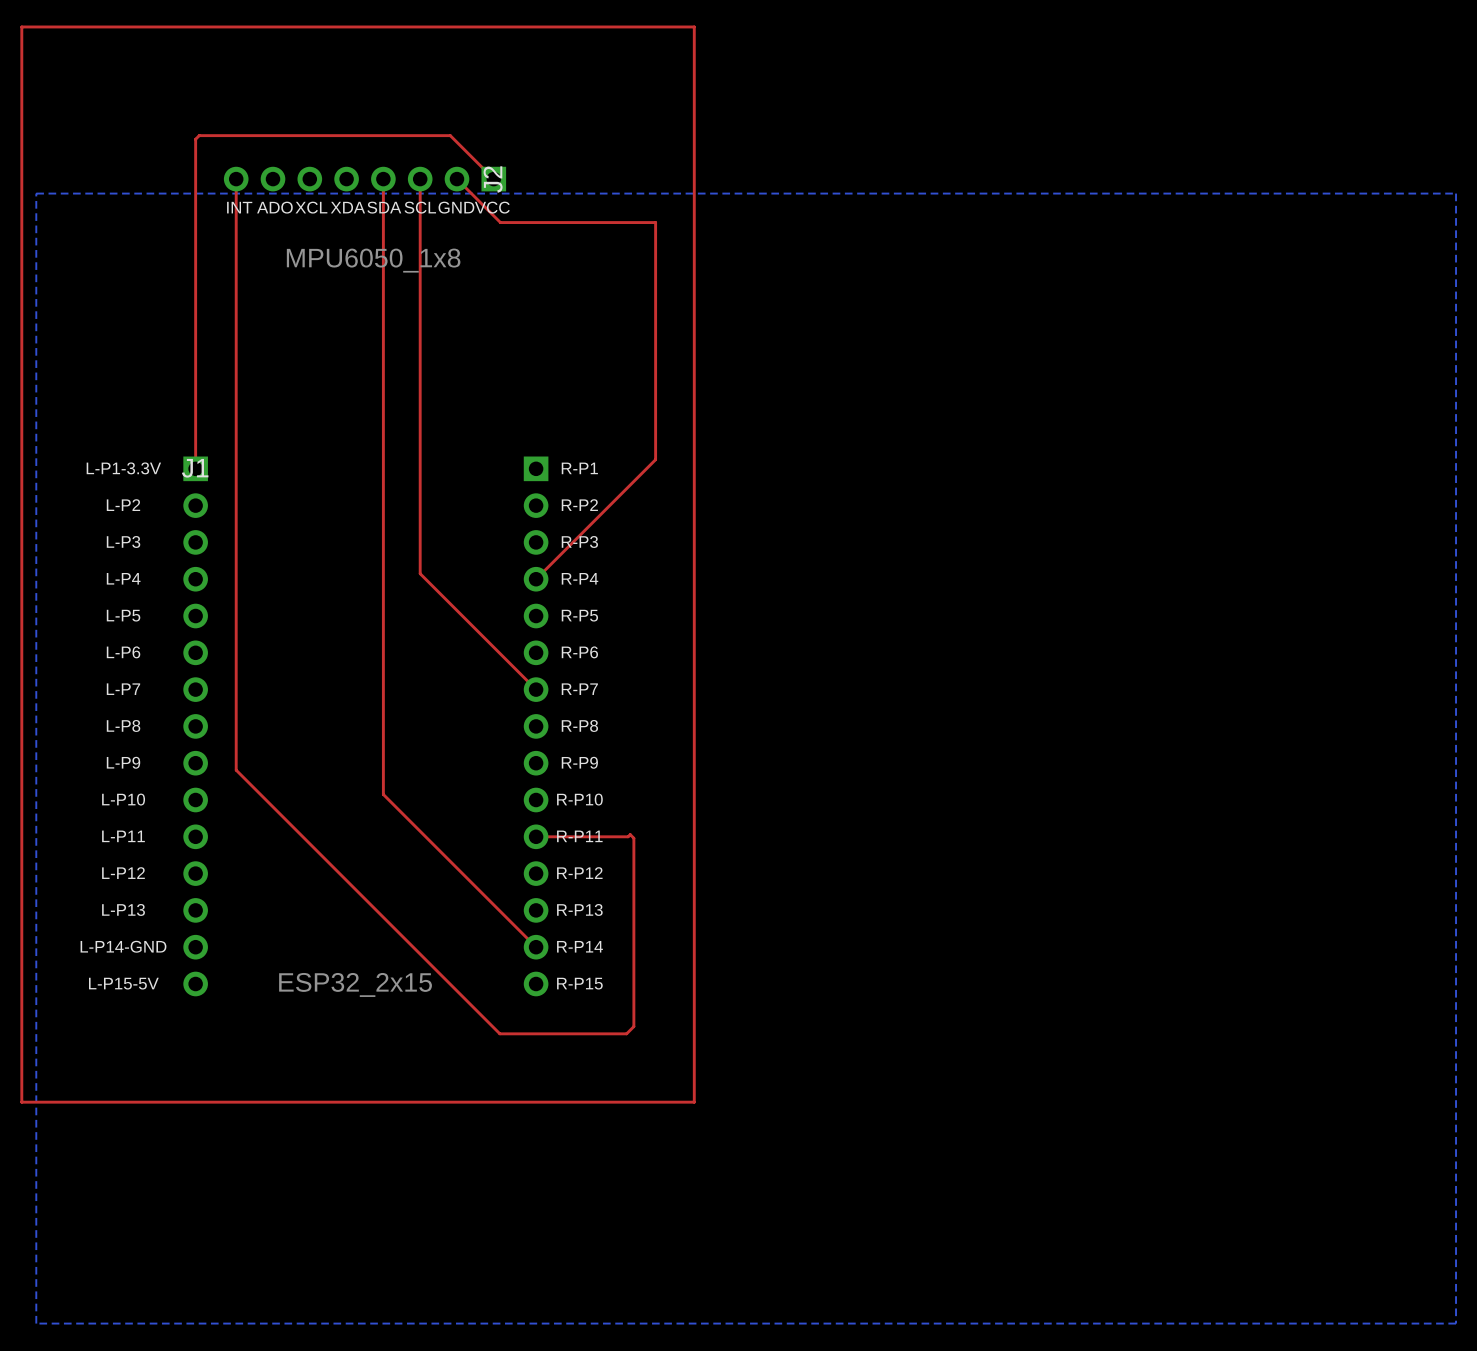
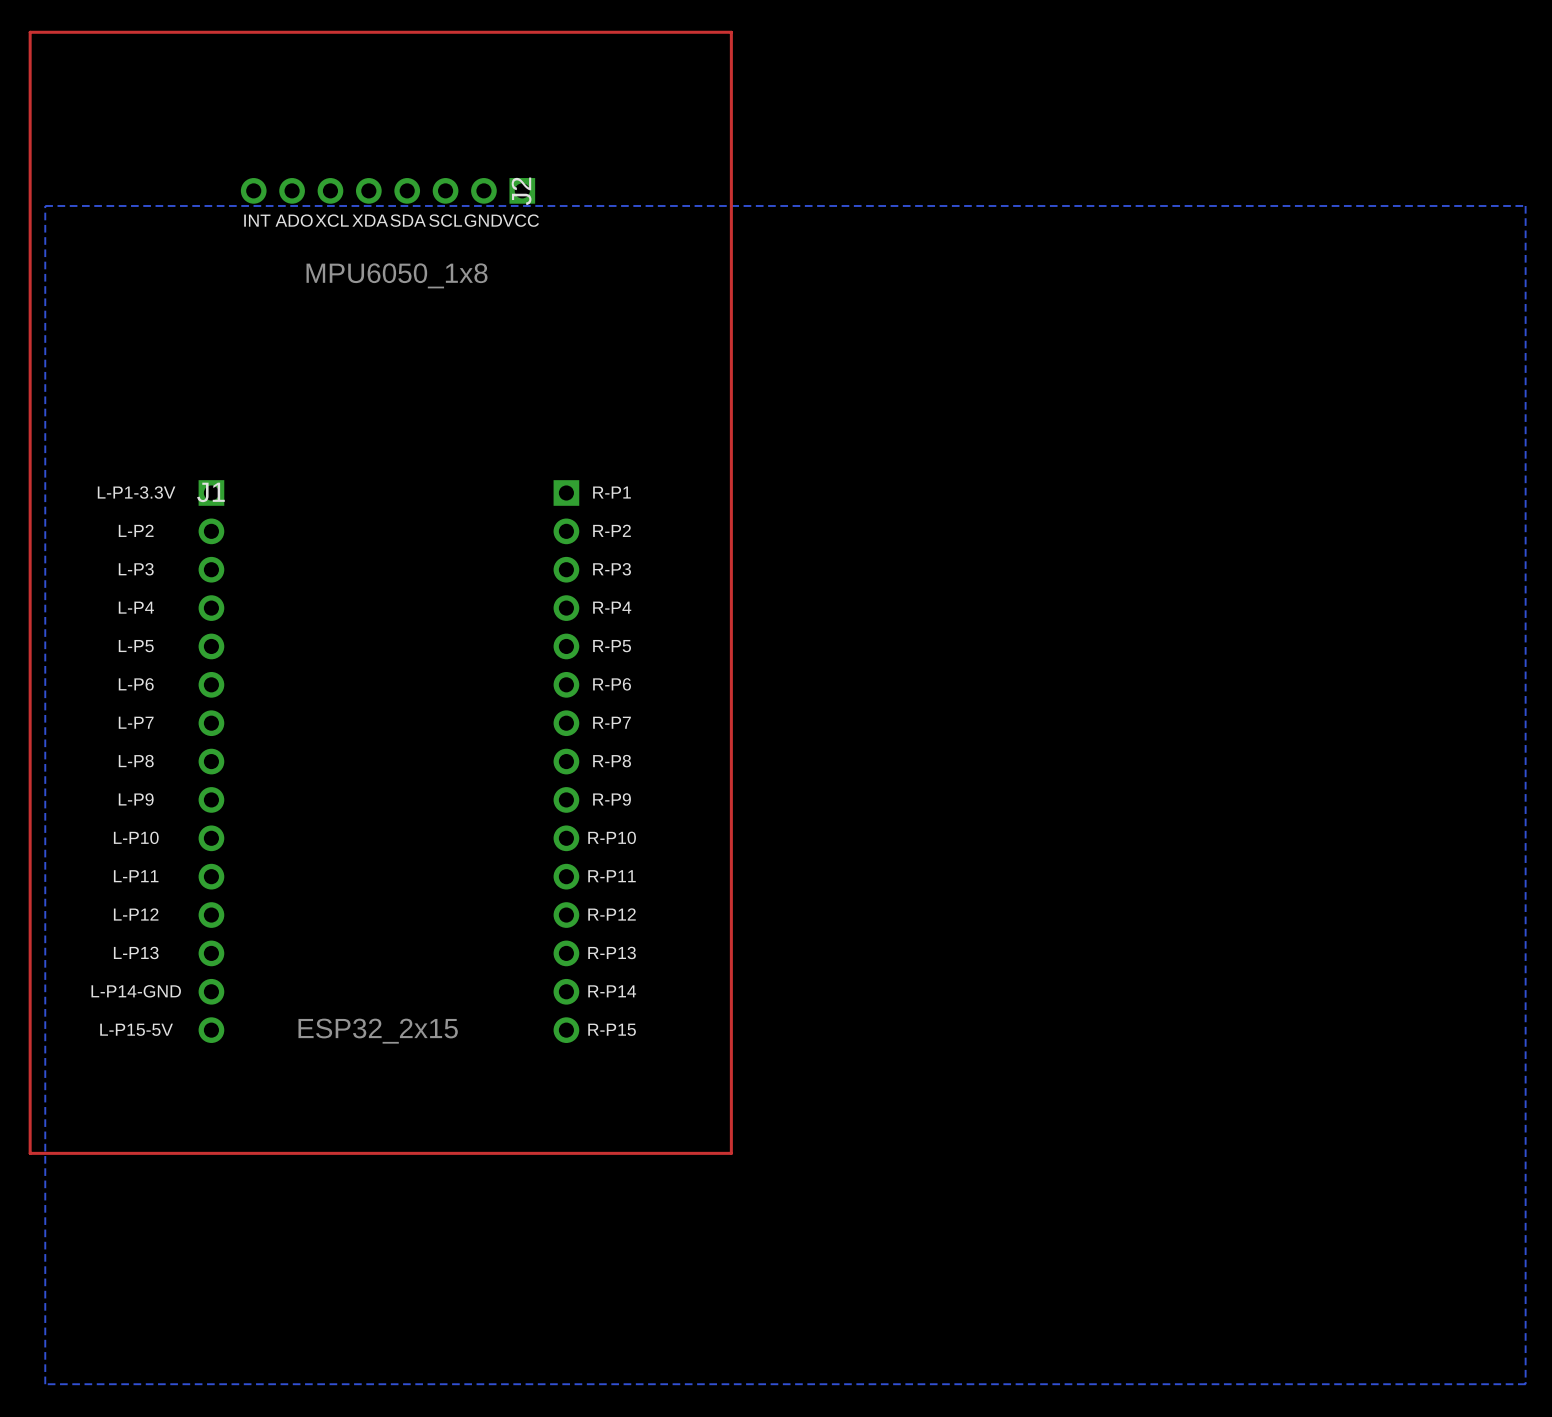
top track: (236, 179) (236, 770) (499, 1033) (626, 1033) (633, 1026) (633, 838) (630, 834) (628, 836) (536, 836) -> none
top track: (383, 179) (383, 794) (536, 947) -> none
top track: (420, 179) (420, 573) (536, 689) -> none
top track: (456, 179) (500, 222) (655, 222) (655, 459) (536, 579) -> none
top track: (493, 179) (450, 135) (199, 135) (195, 139) (195, 468) -> none

